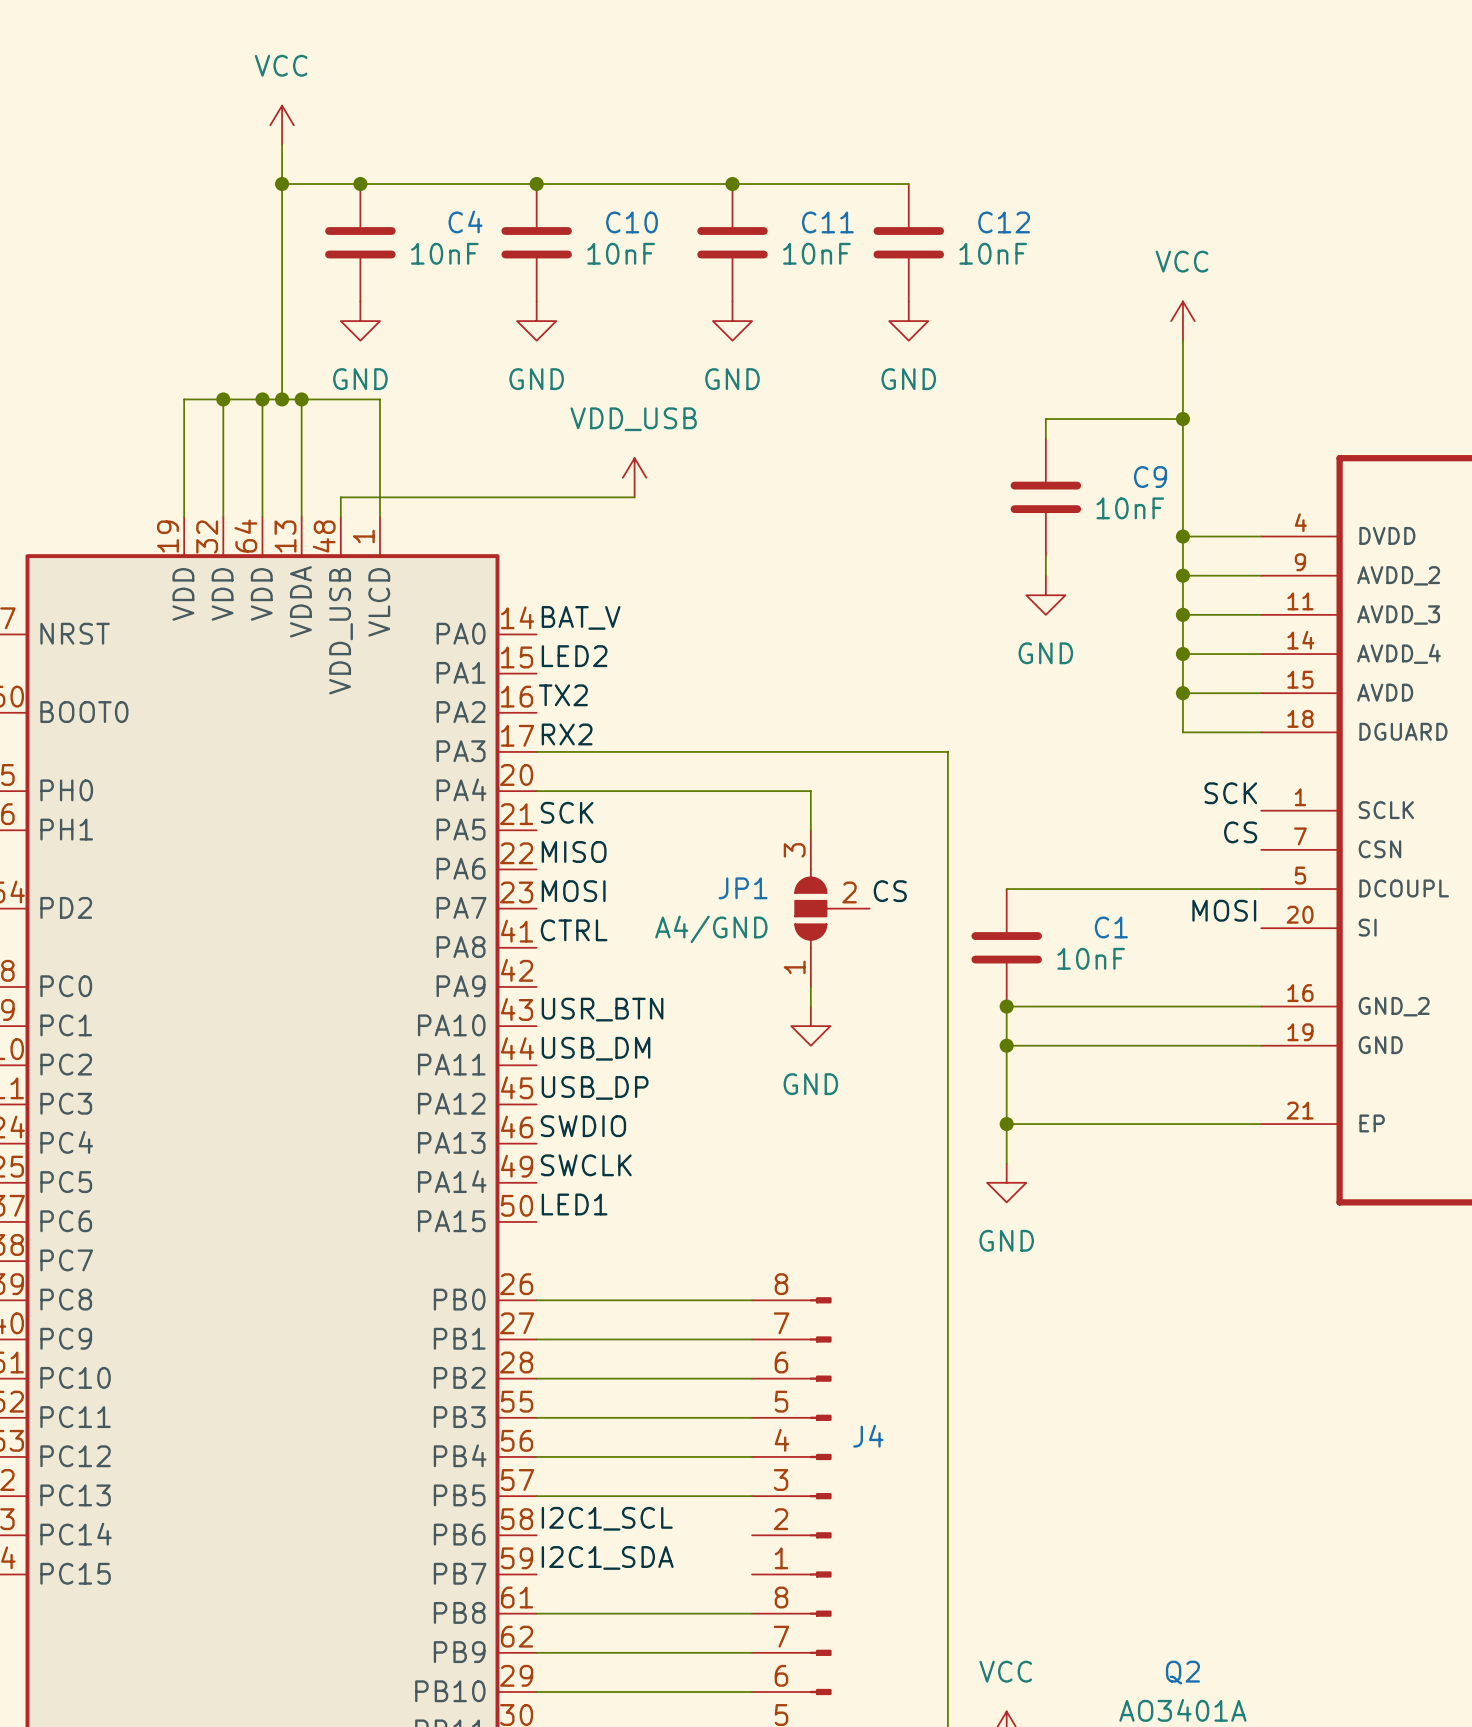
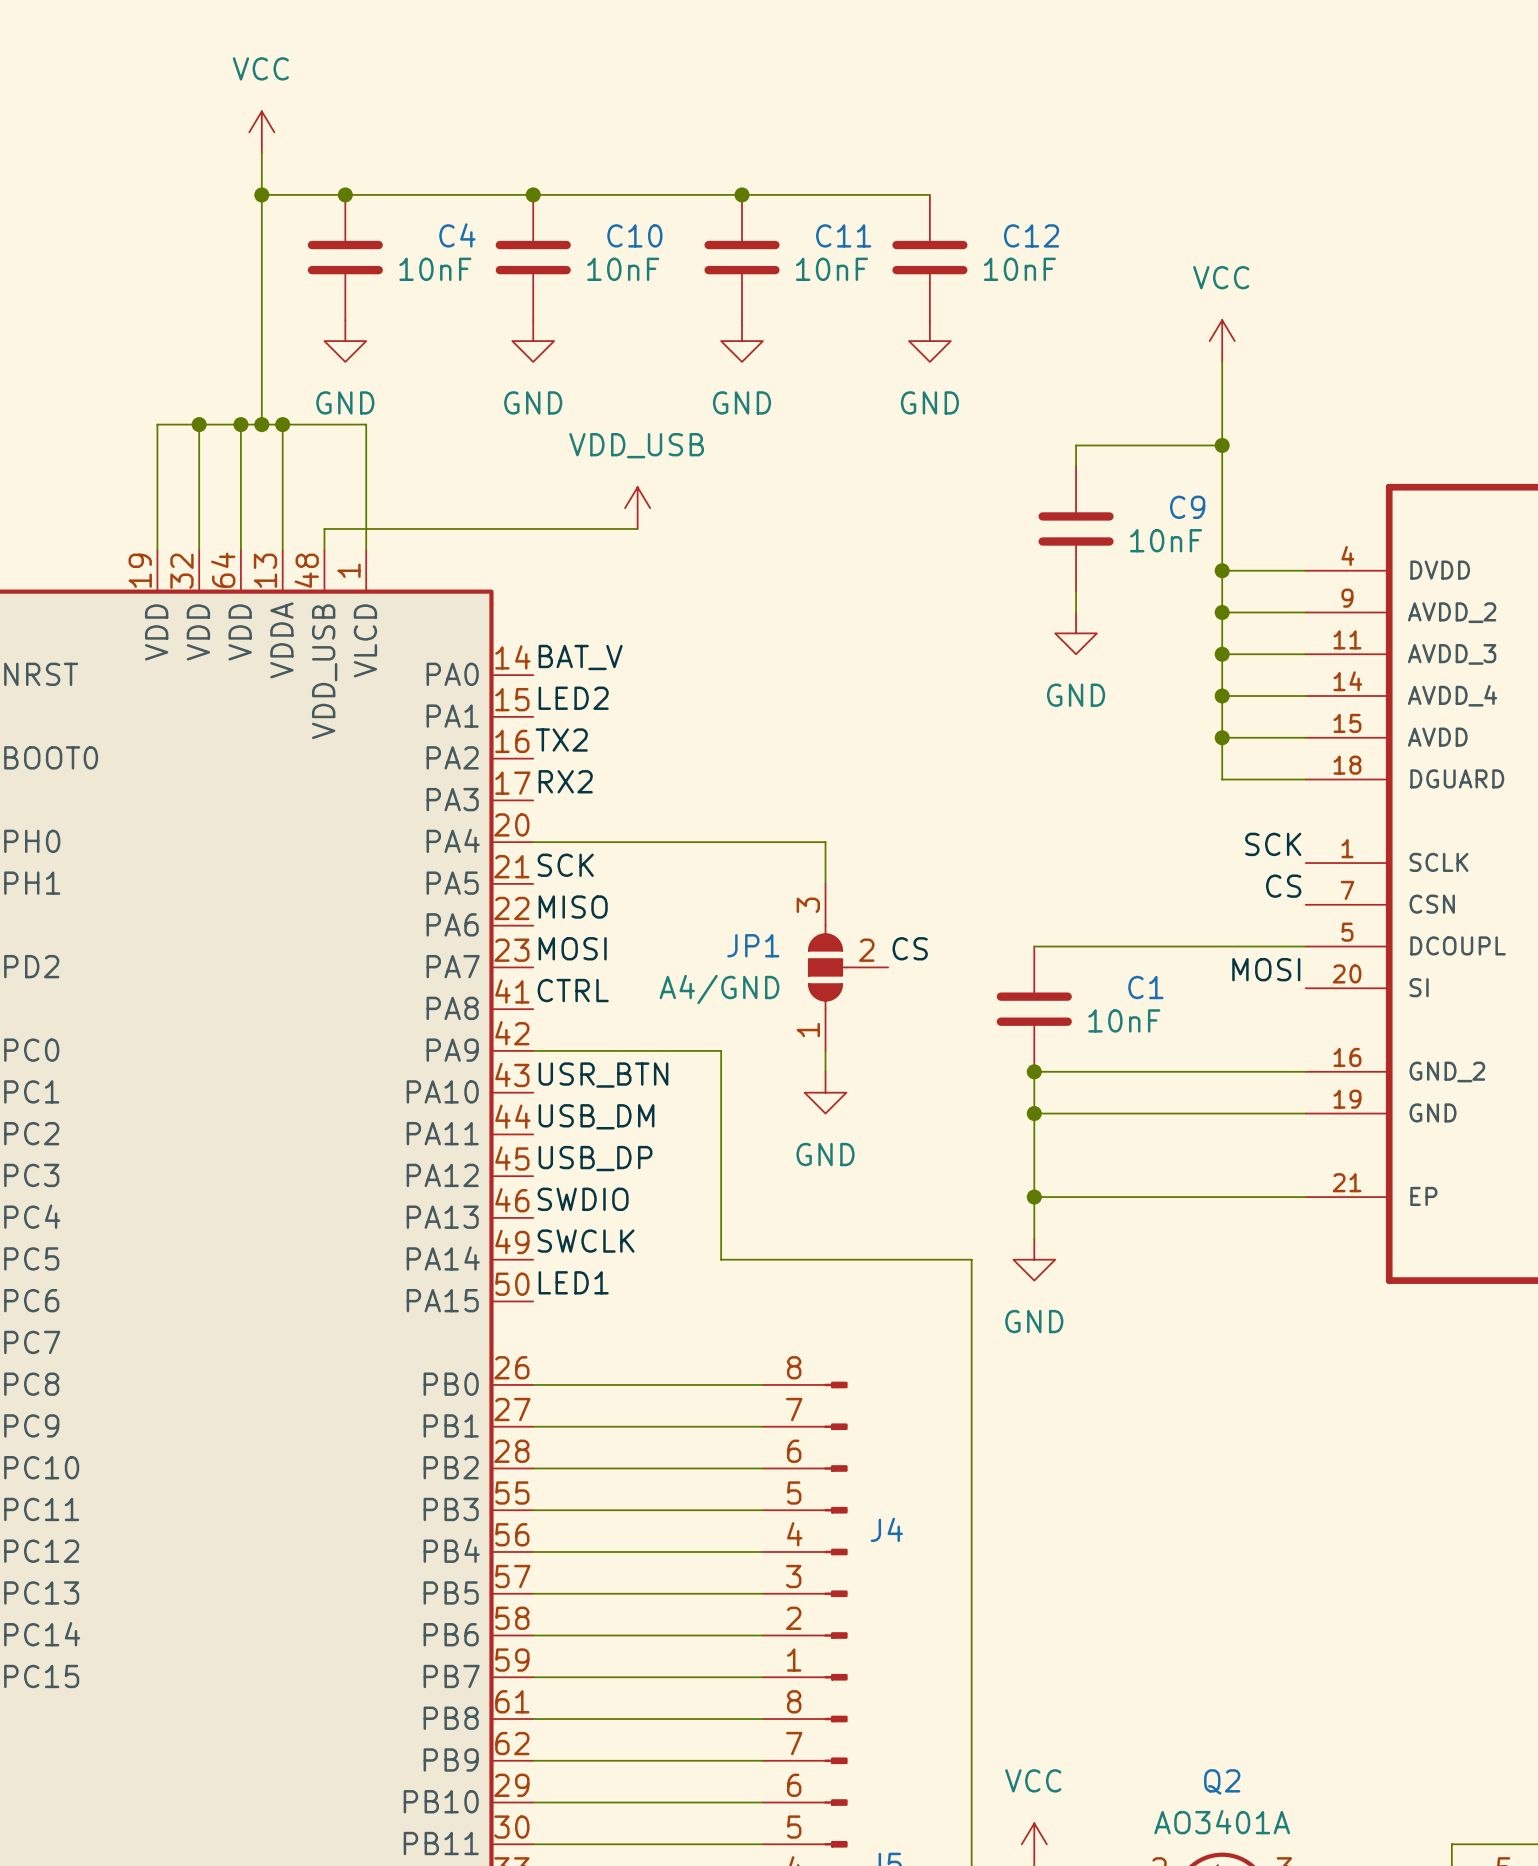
wire: (536, 751) (947, 751) (947, 1182) -> (533, 1050) (721, 1050) (721, 1259) (971, 1259)
label: I2C1_SCL (607, 1518) -> none
wire: none -> (533, 1635) (762, 1635)
label: I2C1_SDA (607, 1557) -> none
wire: none -> (533, 1677) (762, 1677)

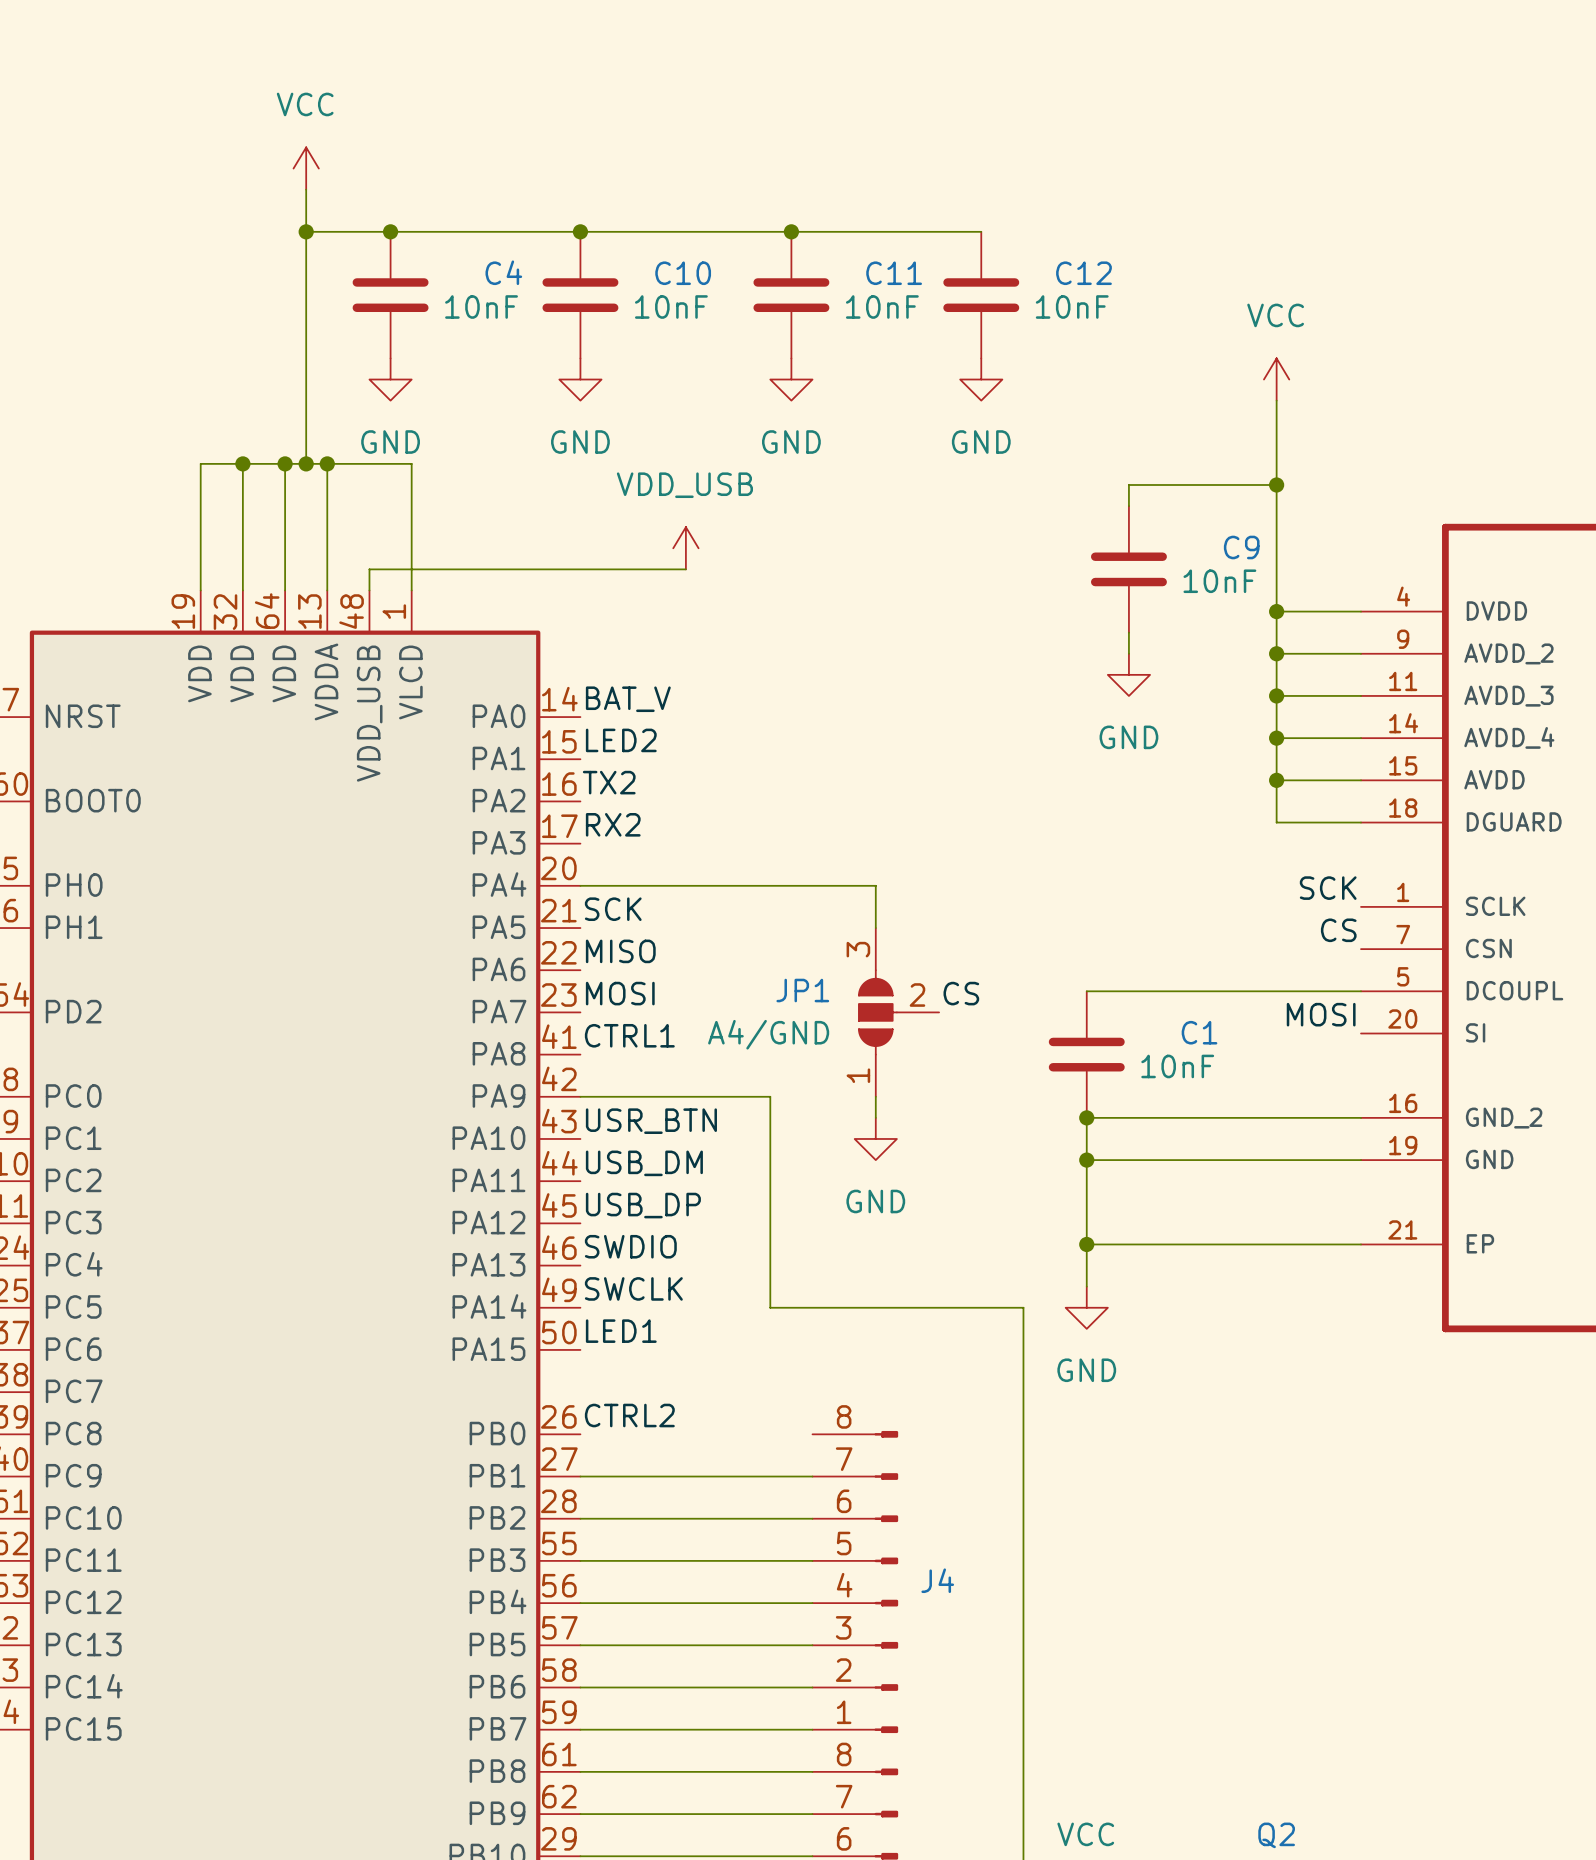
label: CTRL (573, 990) -> CTRL1 (629, 1035)
label: none -> CTRL2 (629, 1415)
wire: (533, 1384) (762, 1384) -> none

